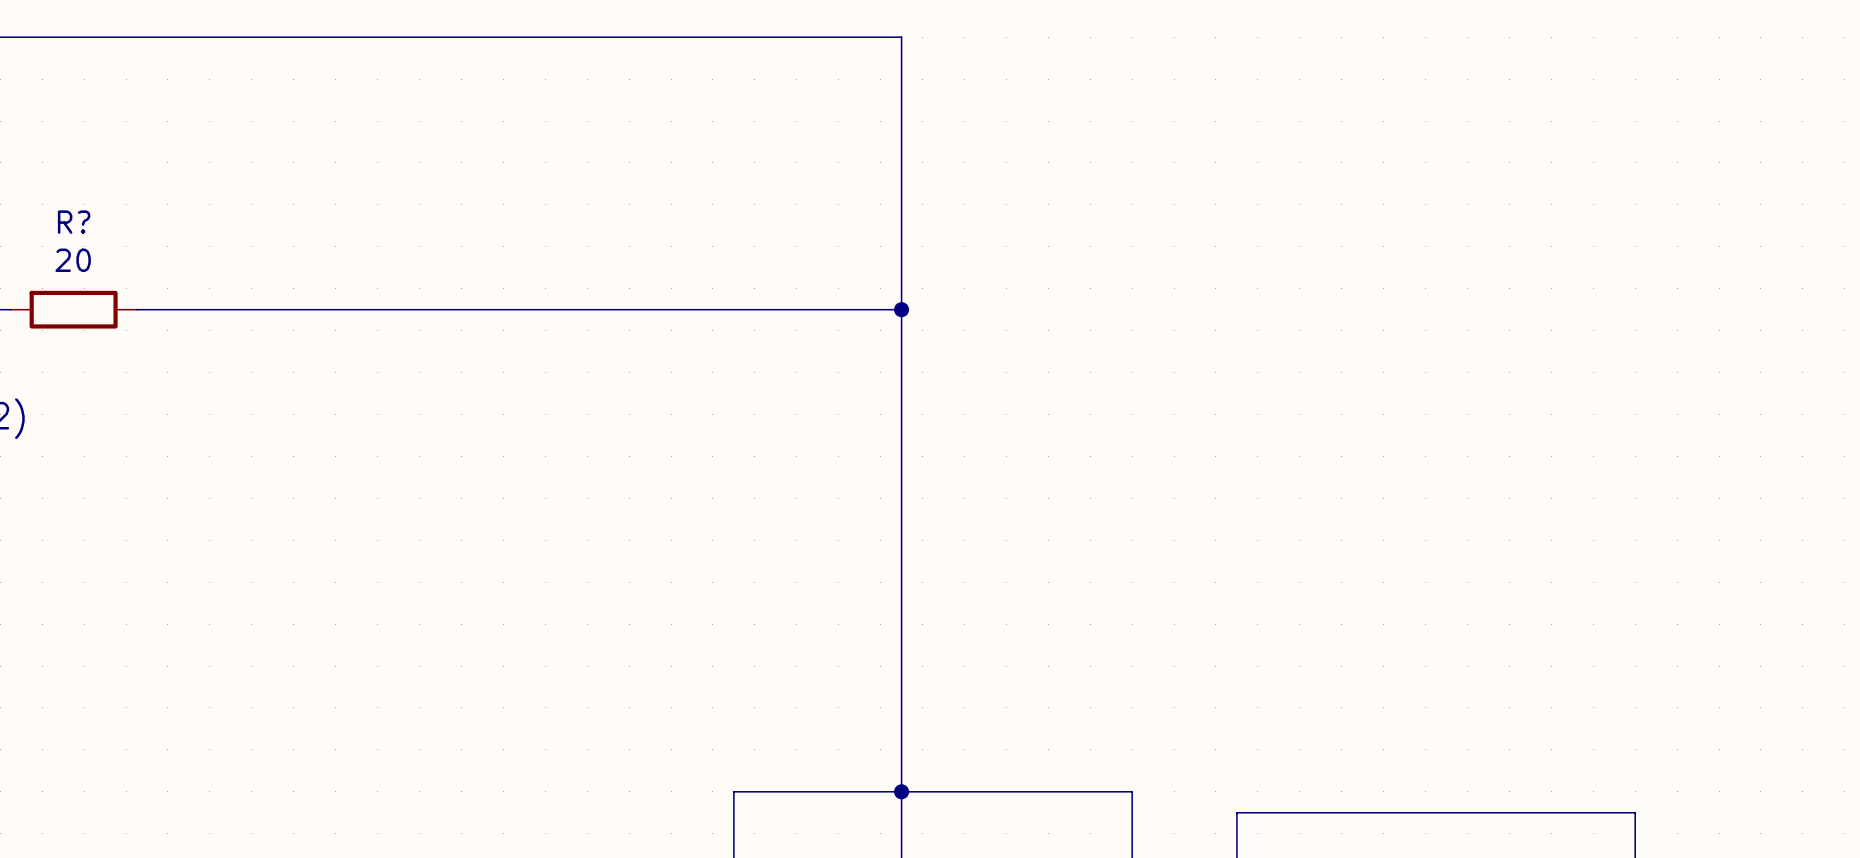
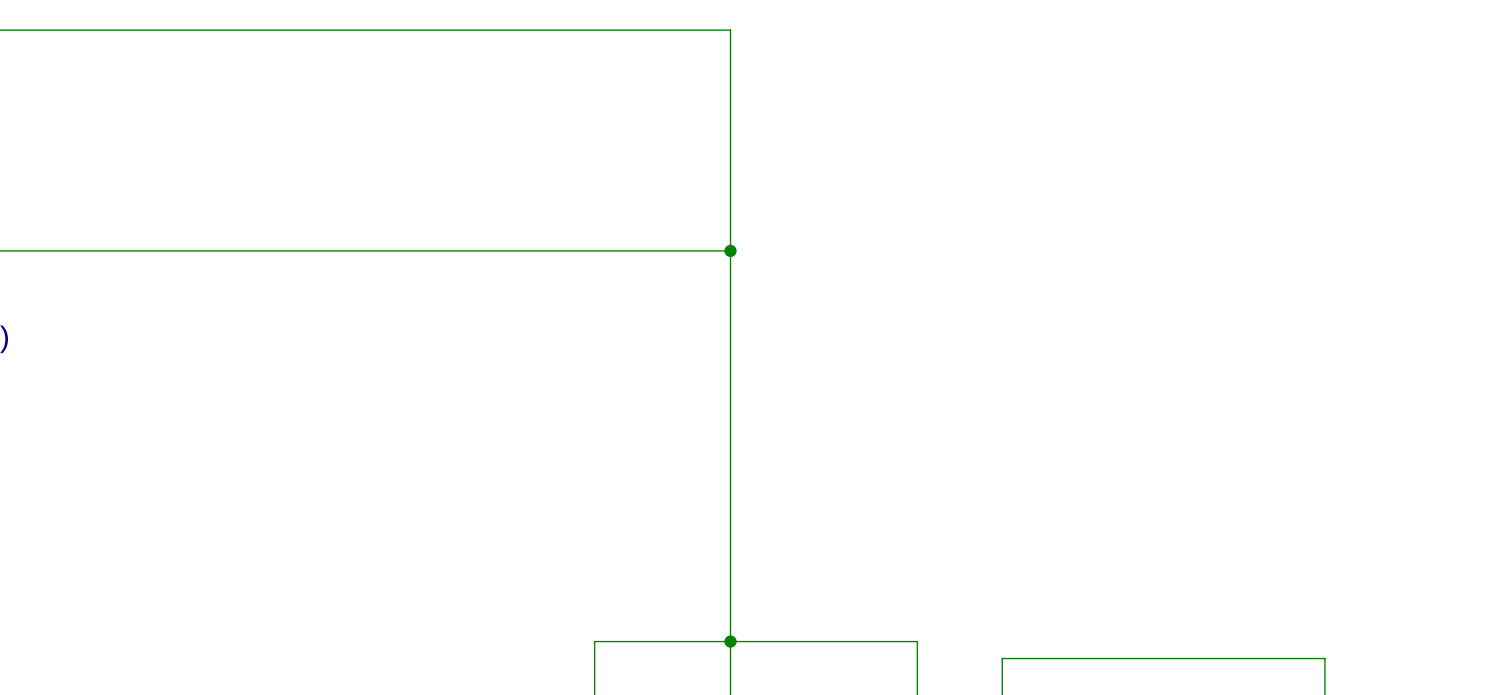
wire: none -> (8, 250) (110, 250)
R?: 20 (73, 309) -> none

